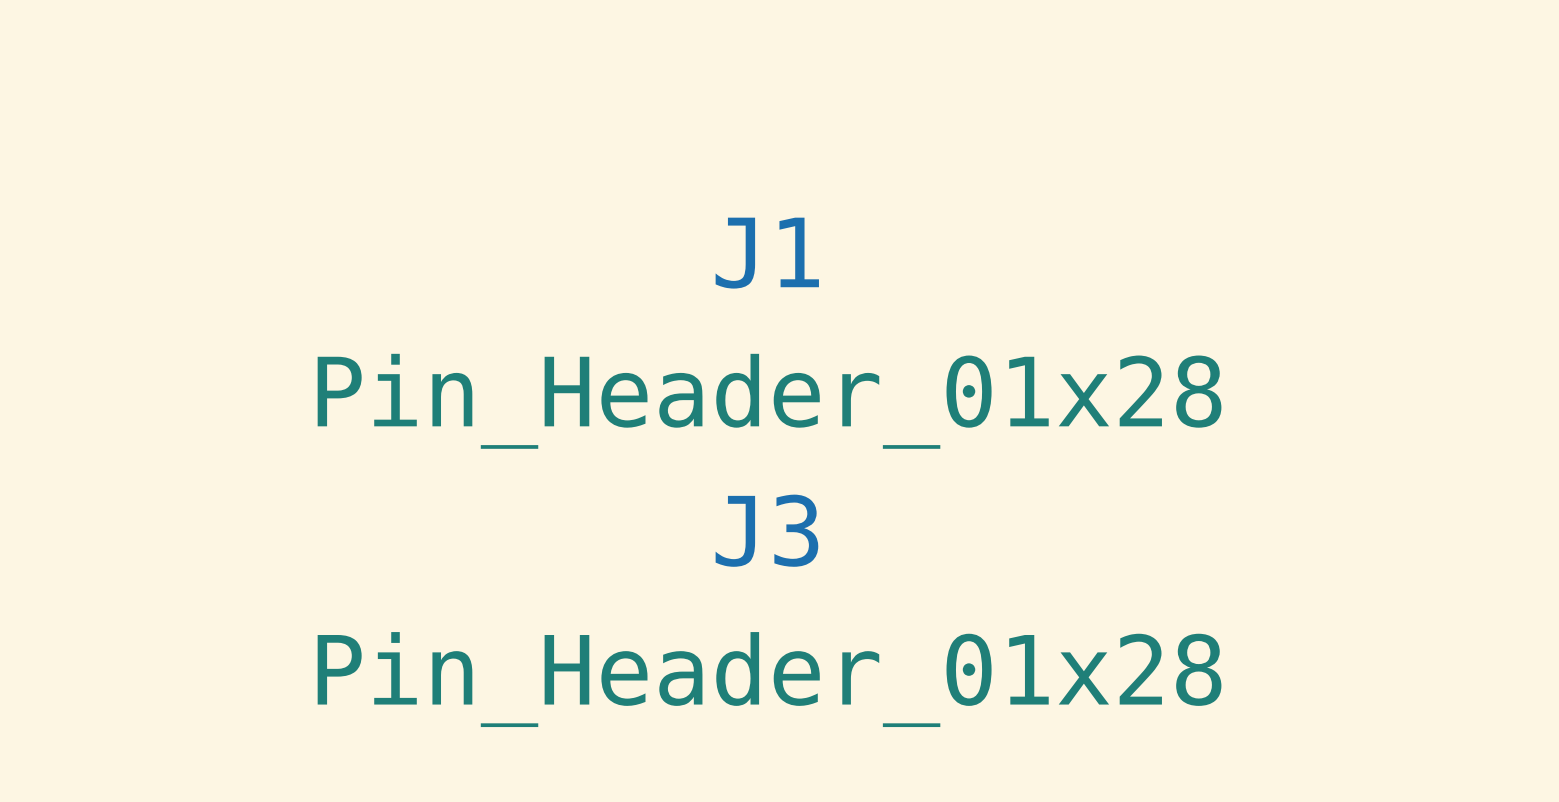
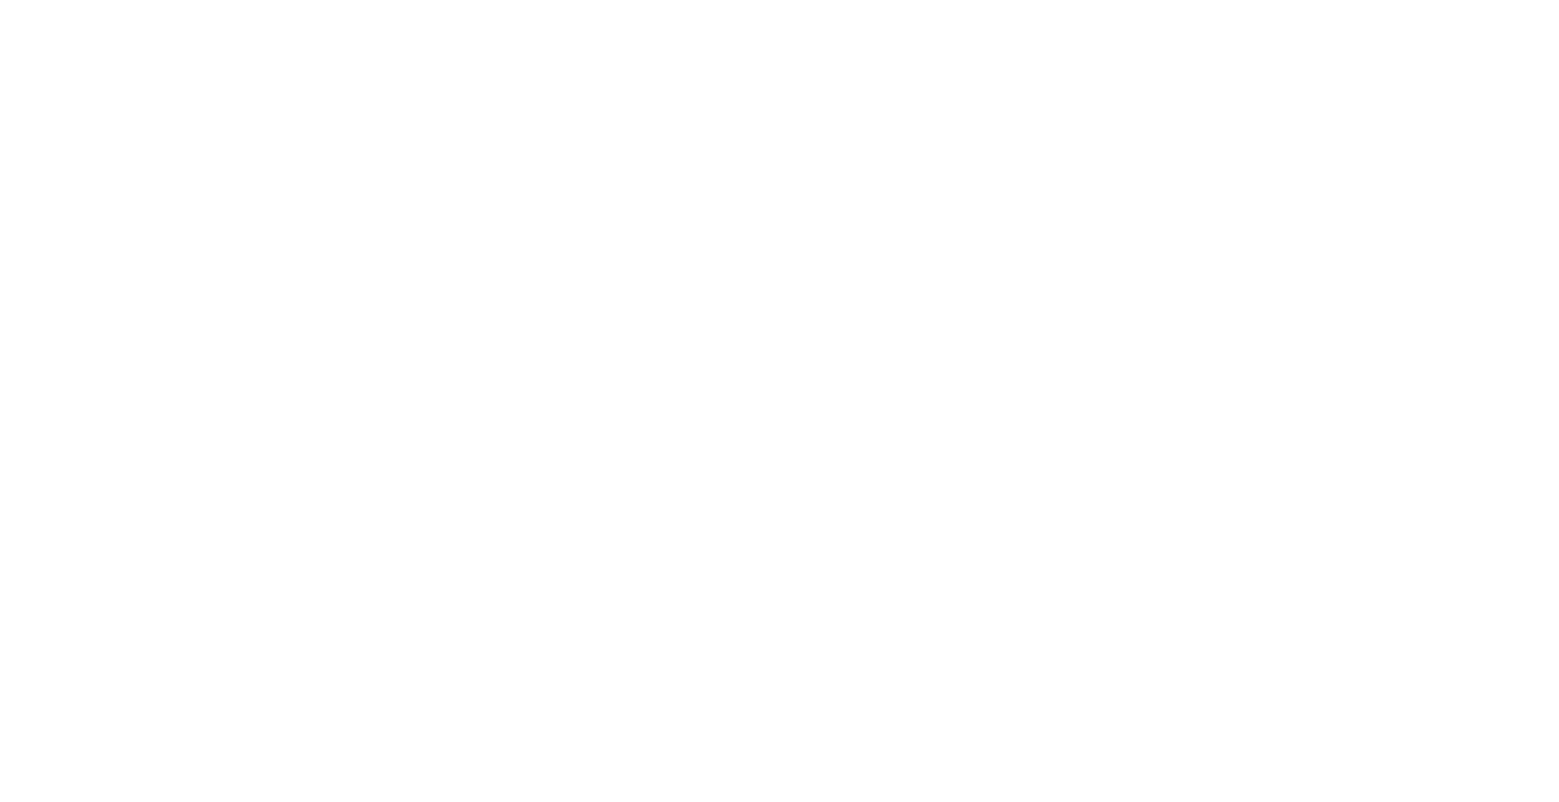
J1: Pin_Header_01x28 (769, 333) -> none
J3: Pin_Header_01x28 (769, 610) -> none

